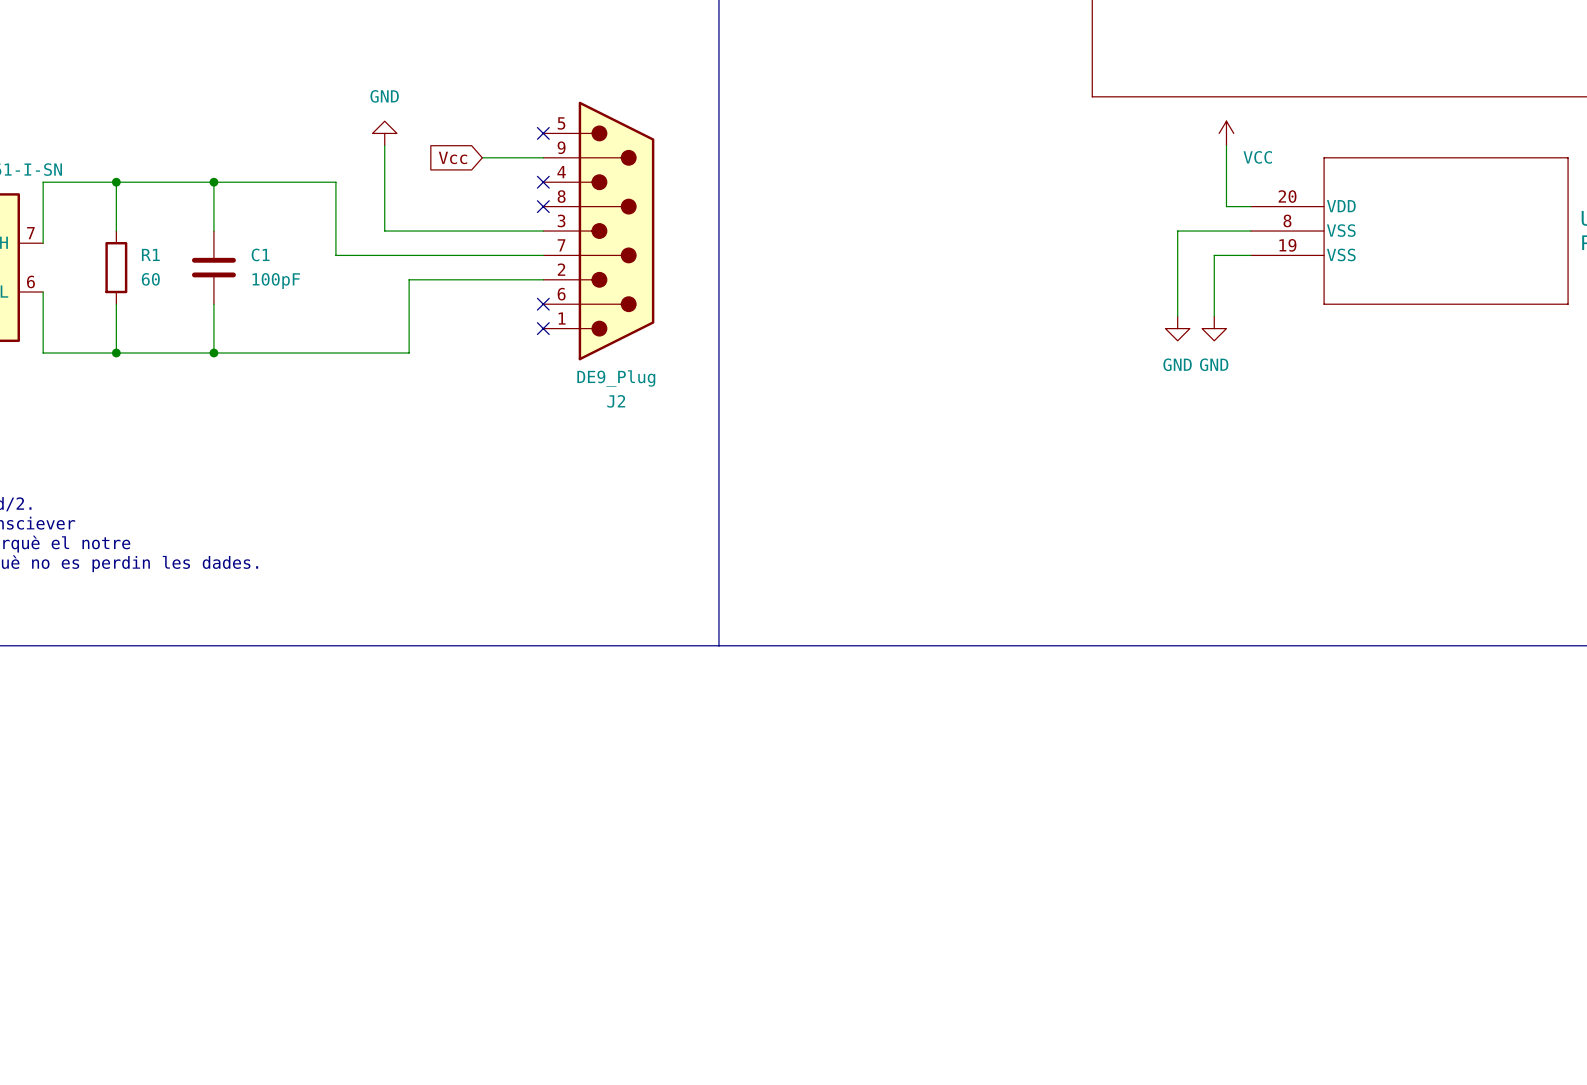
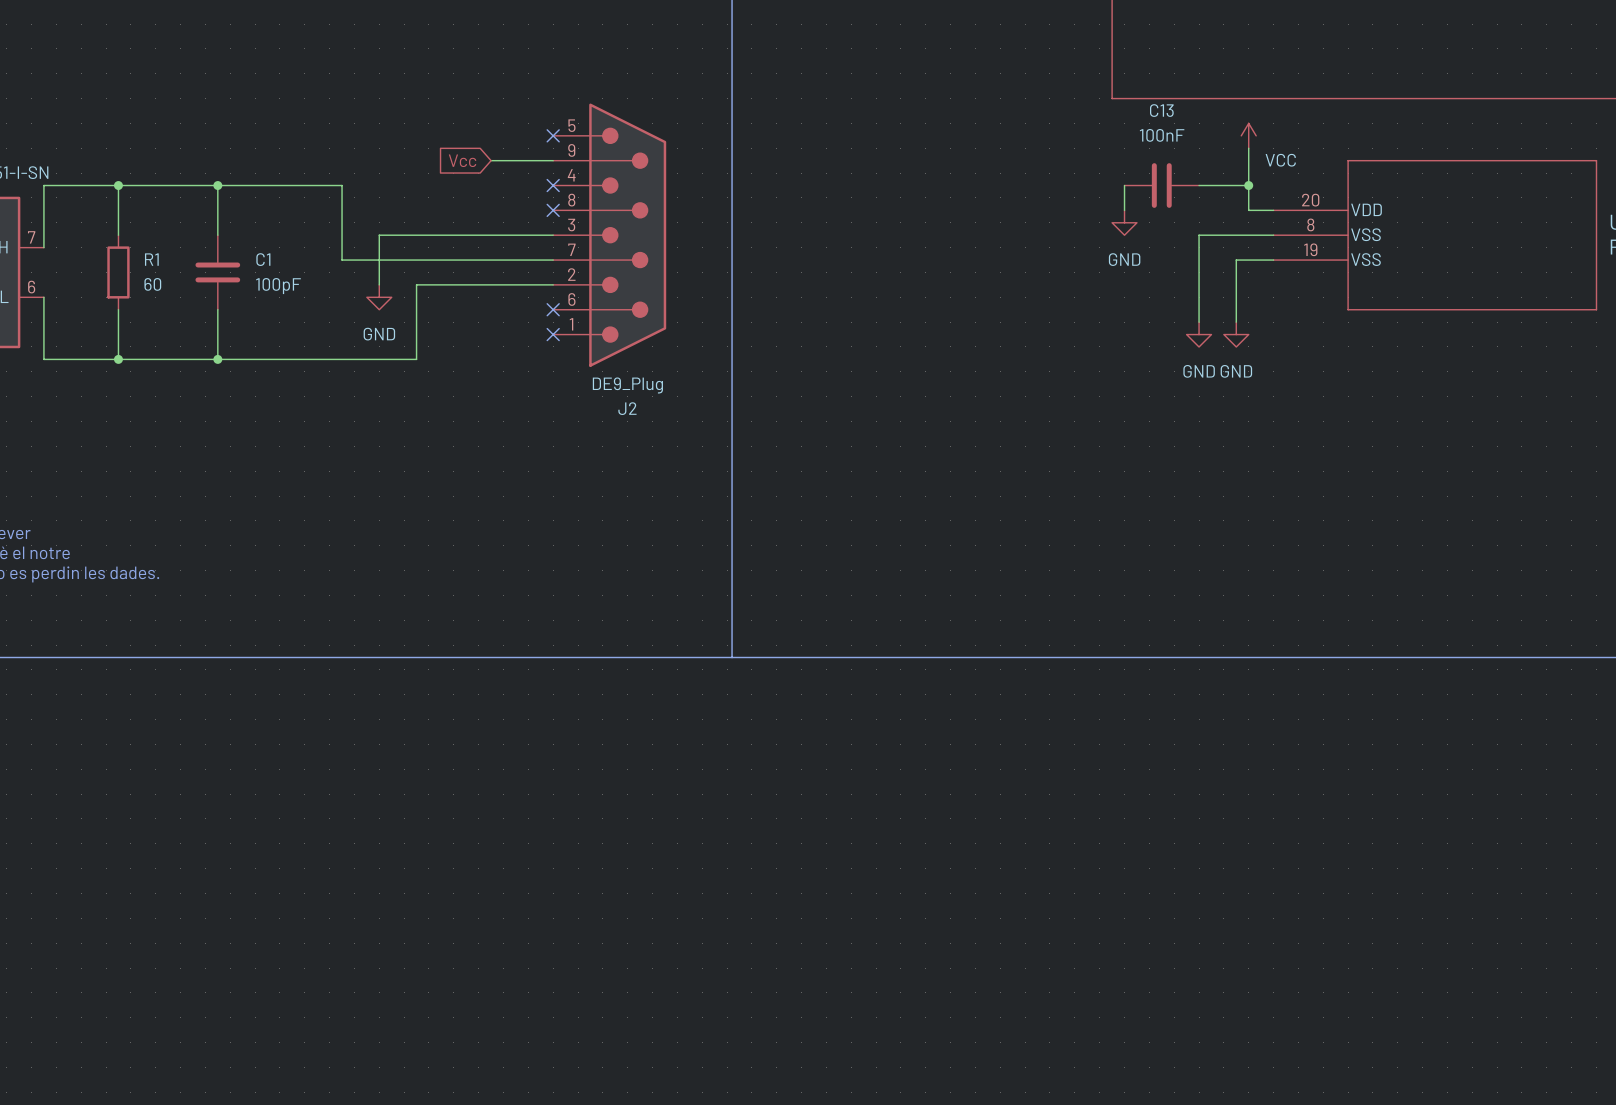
power symbol rotation: 0° (384, 133) -> 180° (379, 297)
power symbol position: GND (384, 133) -> GND (379, 297)
wire: (384, 145) (384, 231) -> (379, 284) (379, 235) (391, 235)
wire: none -> (1124, 185) (1124, 210)
C13: none -> 100nF (1161, 185)
wire: none -> (1199, 185) (1248, 185)
junction: none -> (1248, 185)
power symbol: none -> GND (1124, 222)

